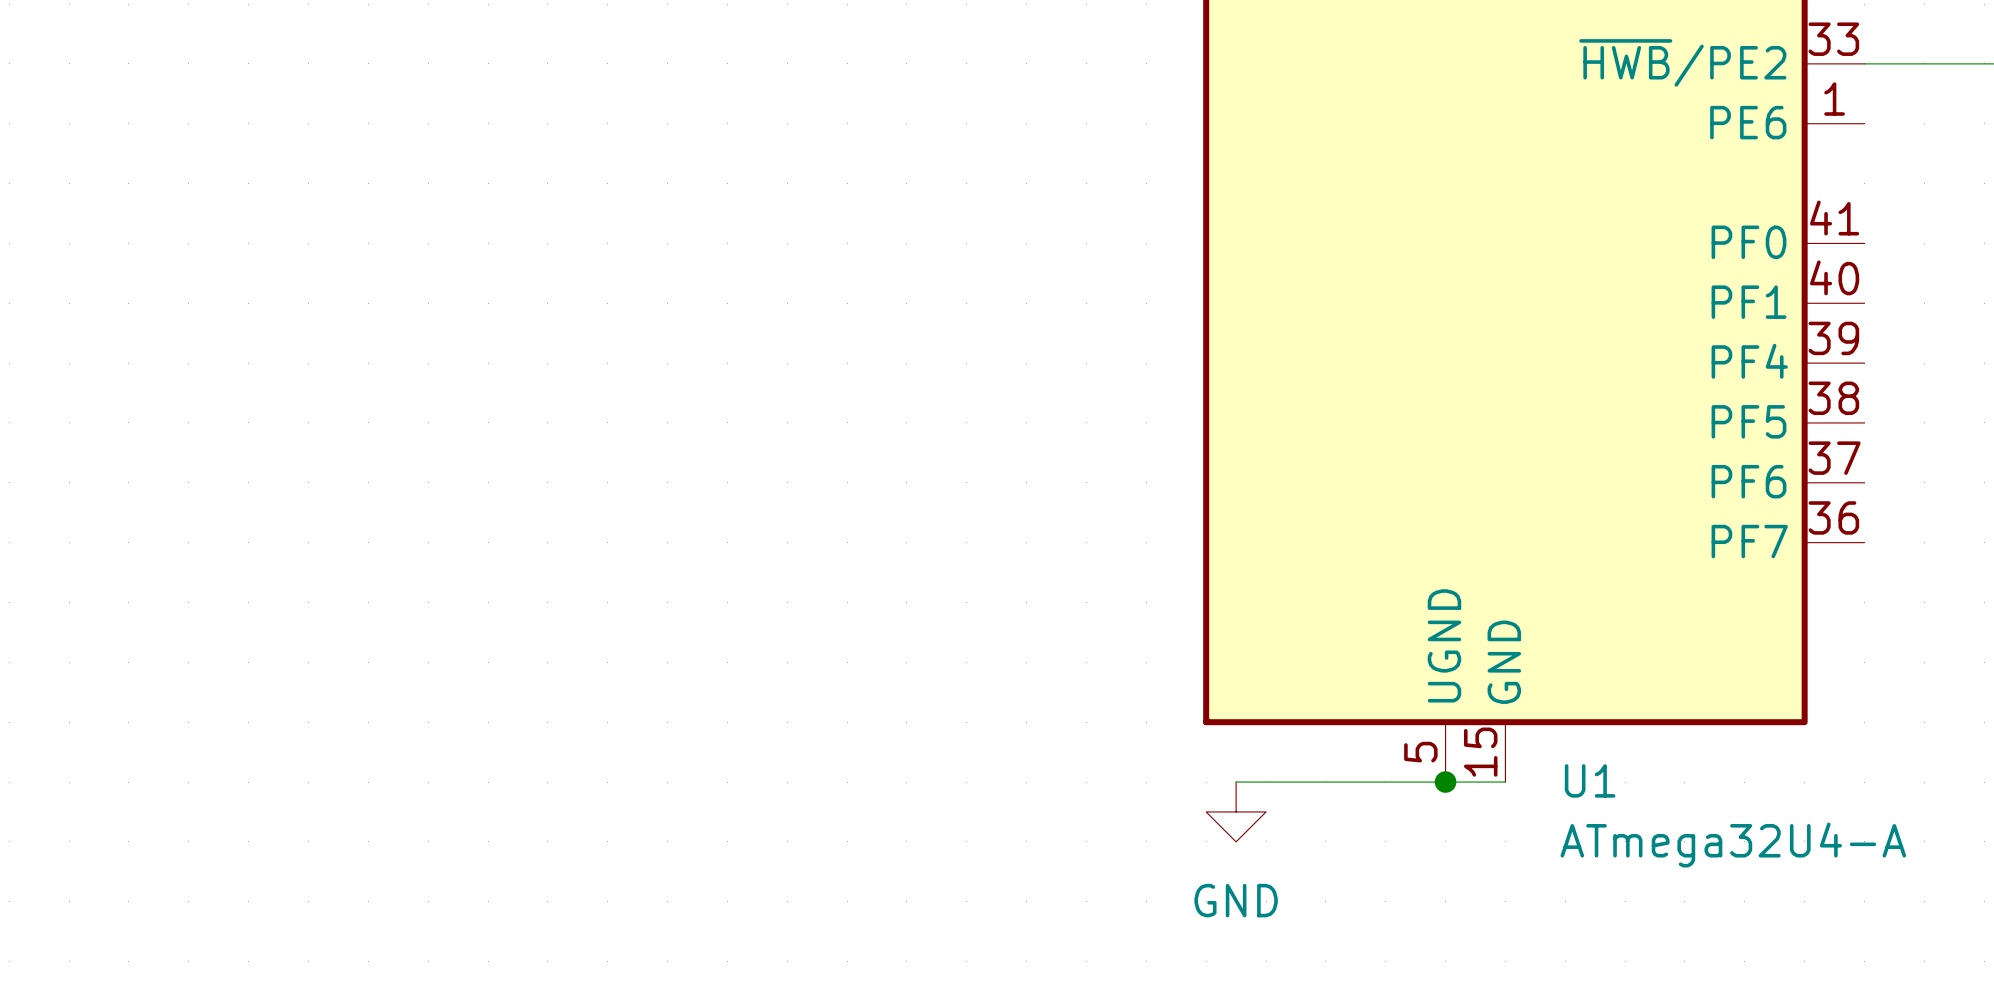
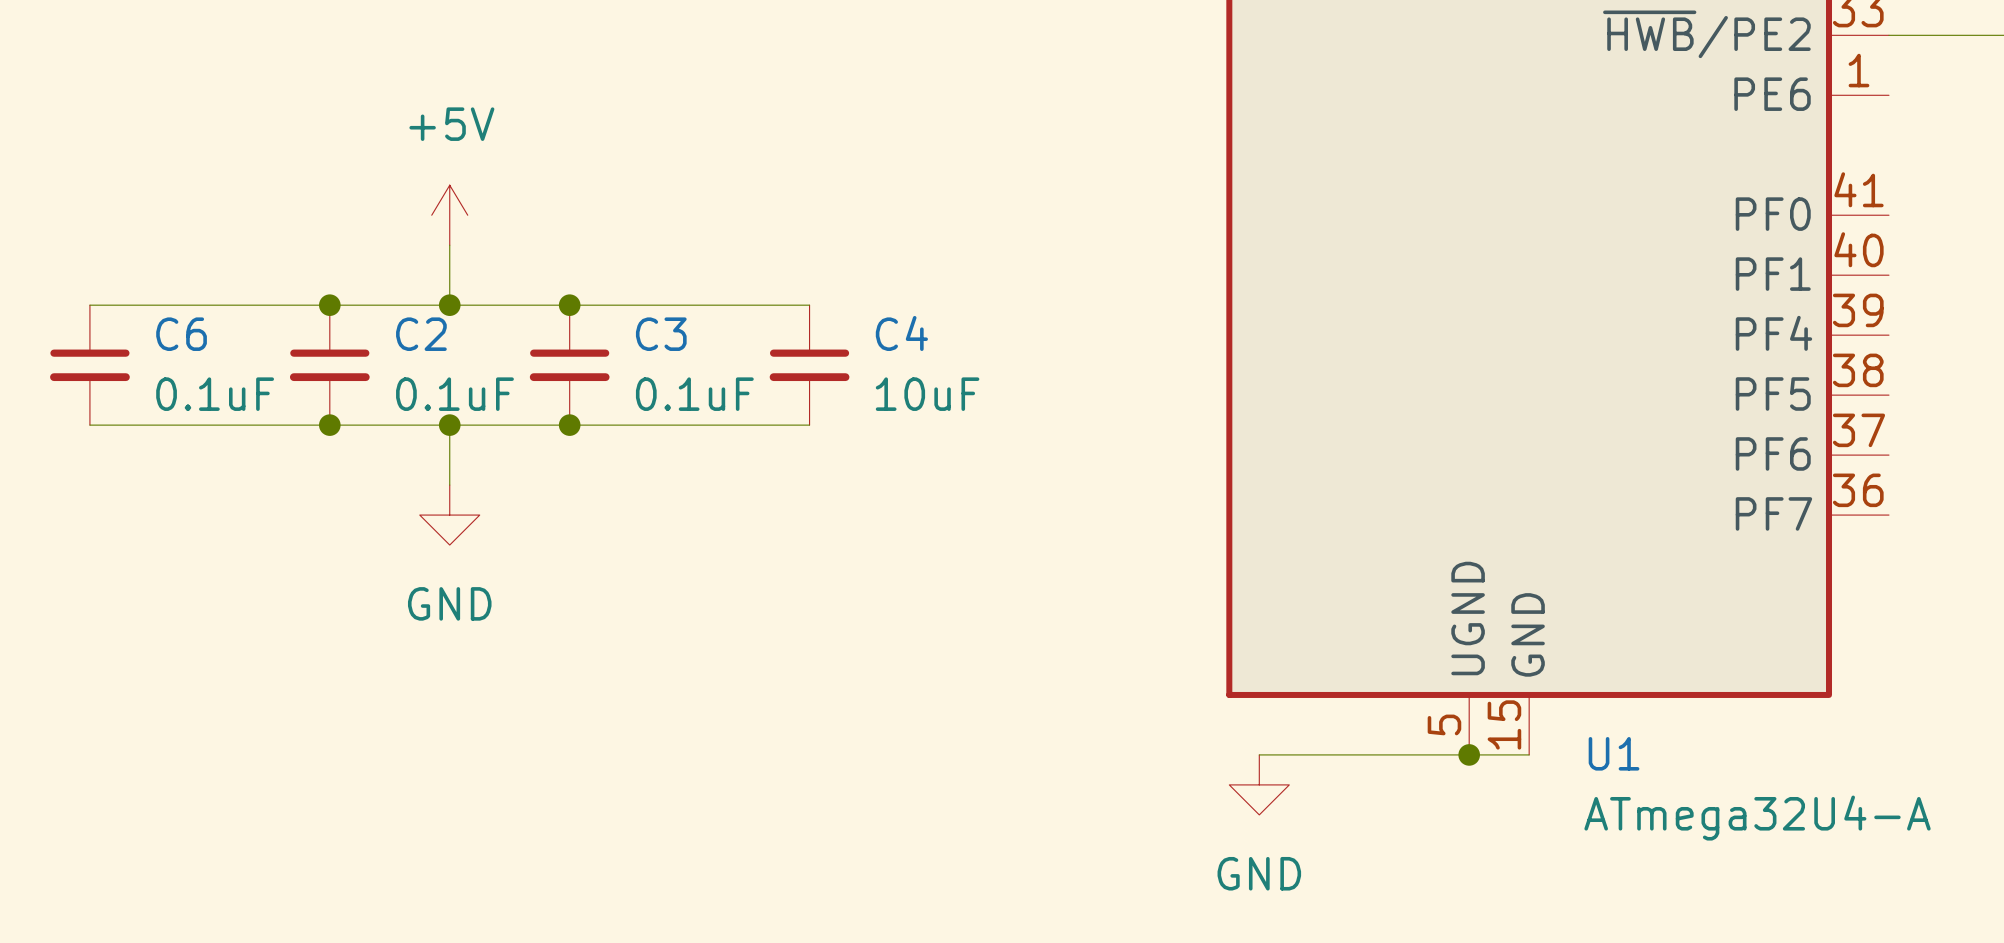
power symbol: none -> +5V (449, 215)
wire: none -> (449, 245) (449, 305)
wire: none -> (89, 305) (809, 305)
junction: none -> (329, 305)
junction: none -> (449, 305)
junction: none -> (569, 305)
C6: none -> 0.1uF (89, 365)
C2: none -> 0.1uF (329, 365)
C3: none -> 0.1uF (569, 365)
C4: none -> 10uF (809, 365)
wire: none -> (89, 425) (809, 425)
junction: none -> (329, 425)
wire: none -> (449, 425) (449, 485)
junction: none -> (449, 425)
junction: none -> (569, 425)
power symbol: none -> GND (449, 515)

